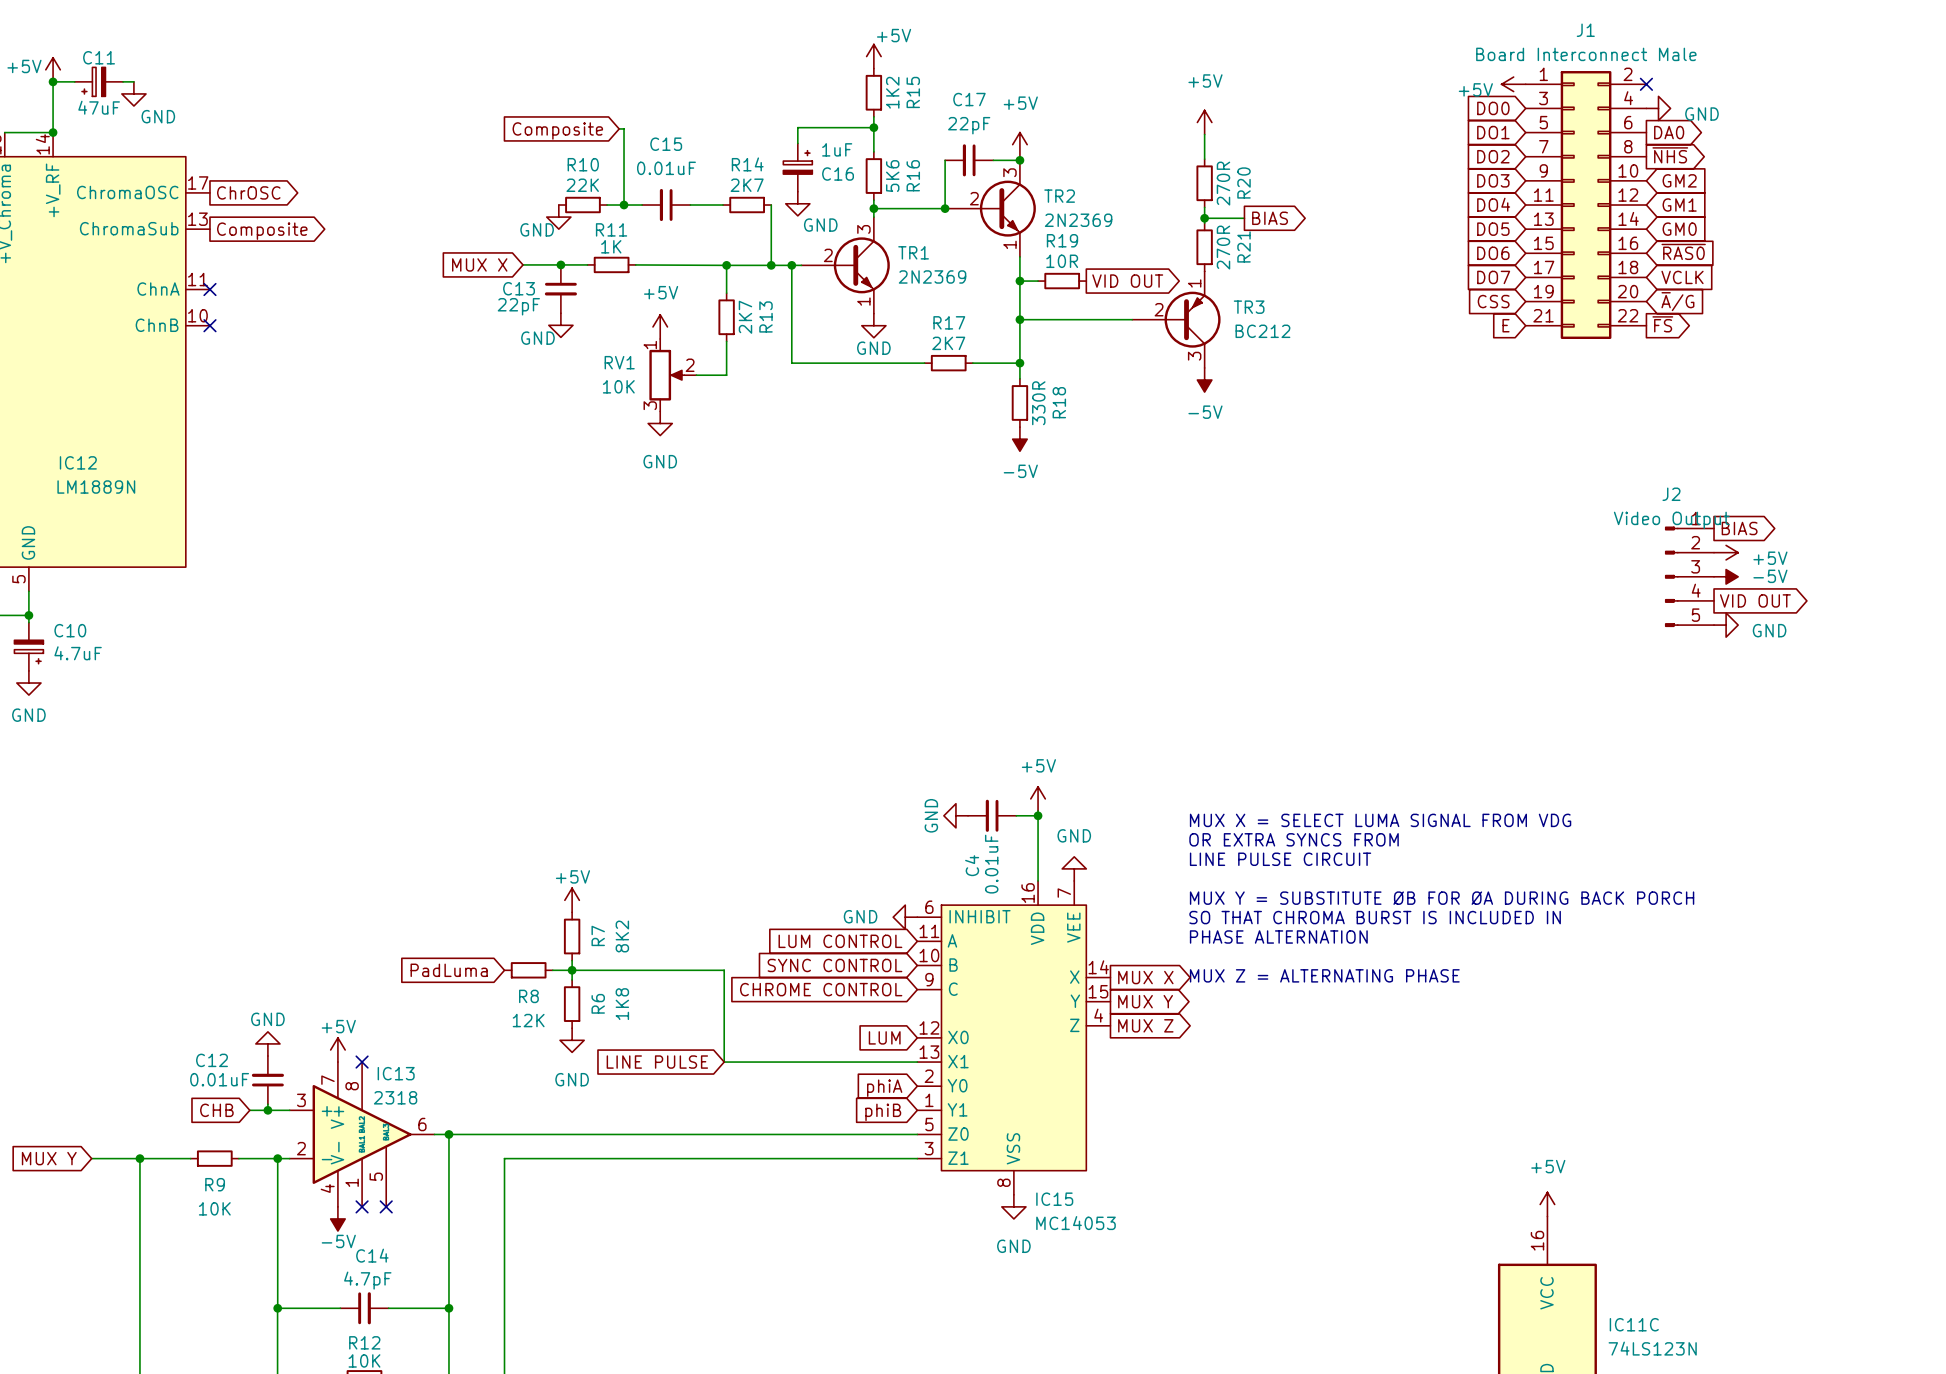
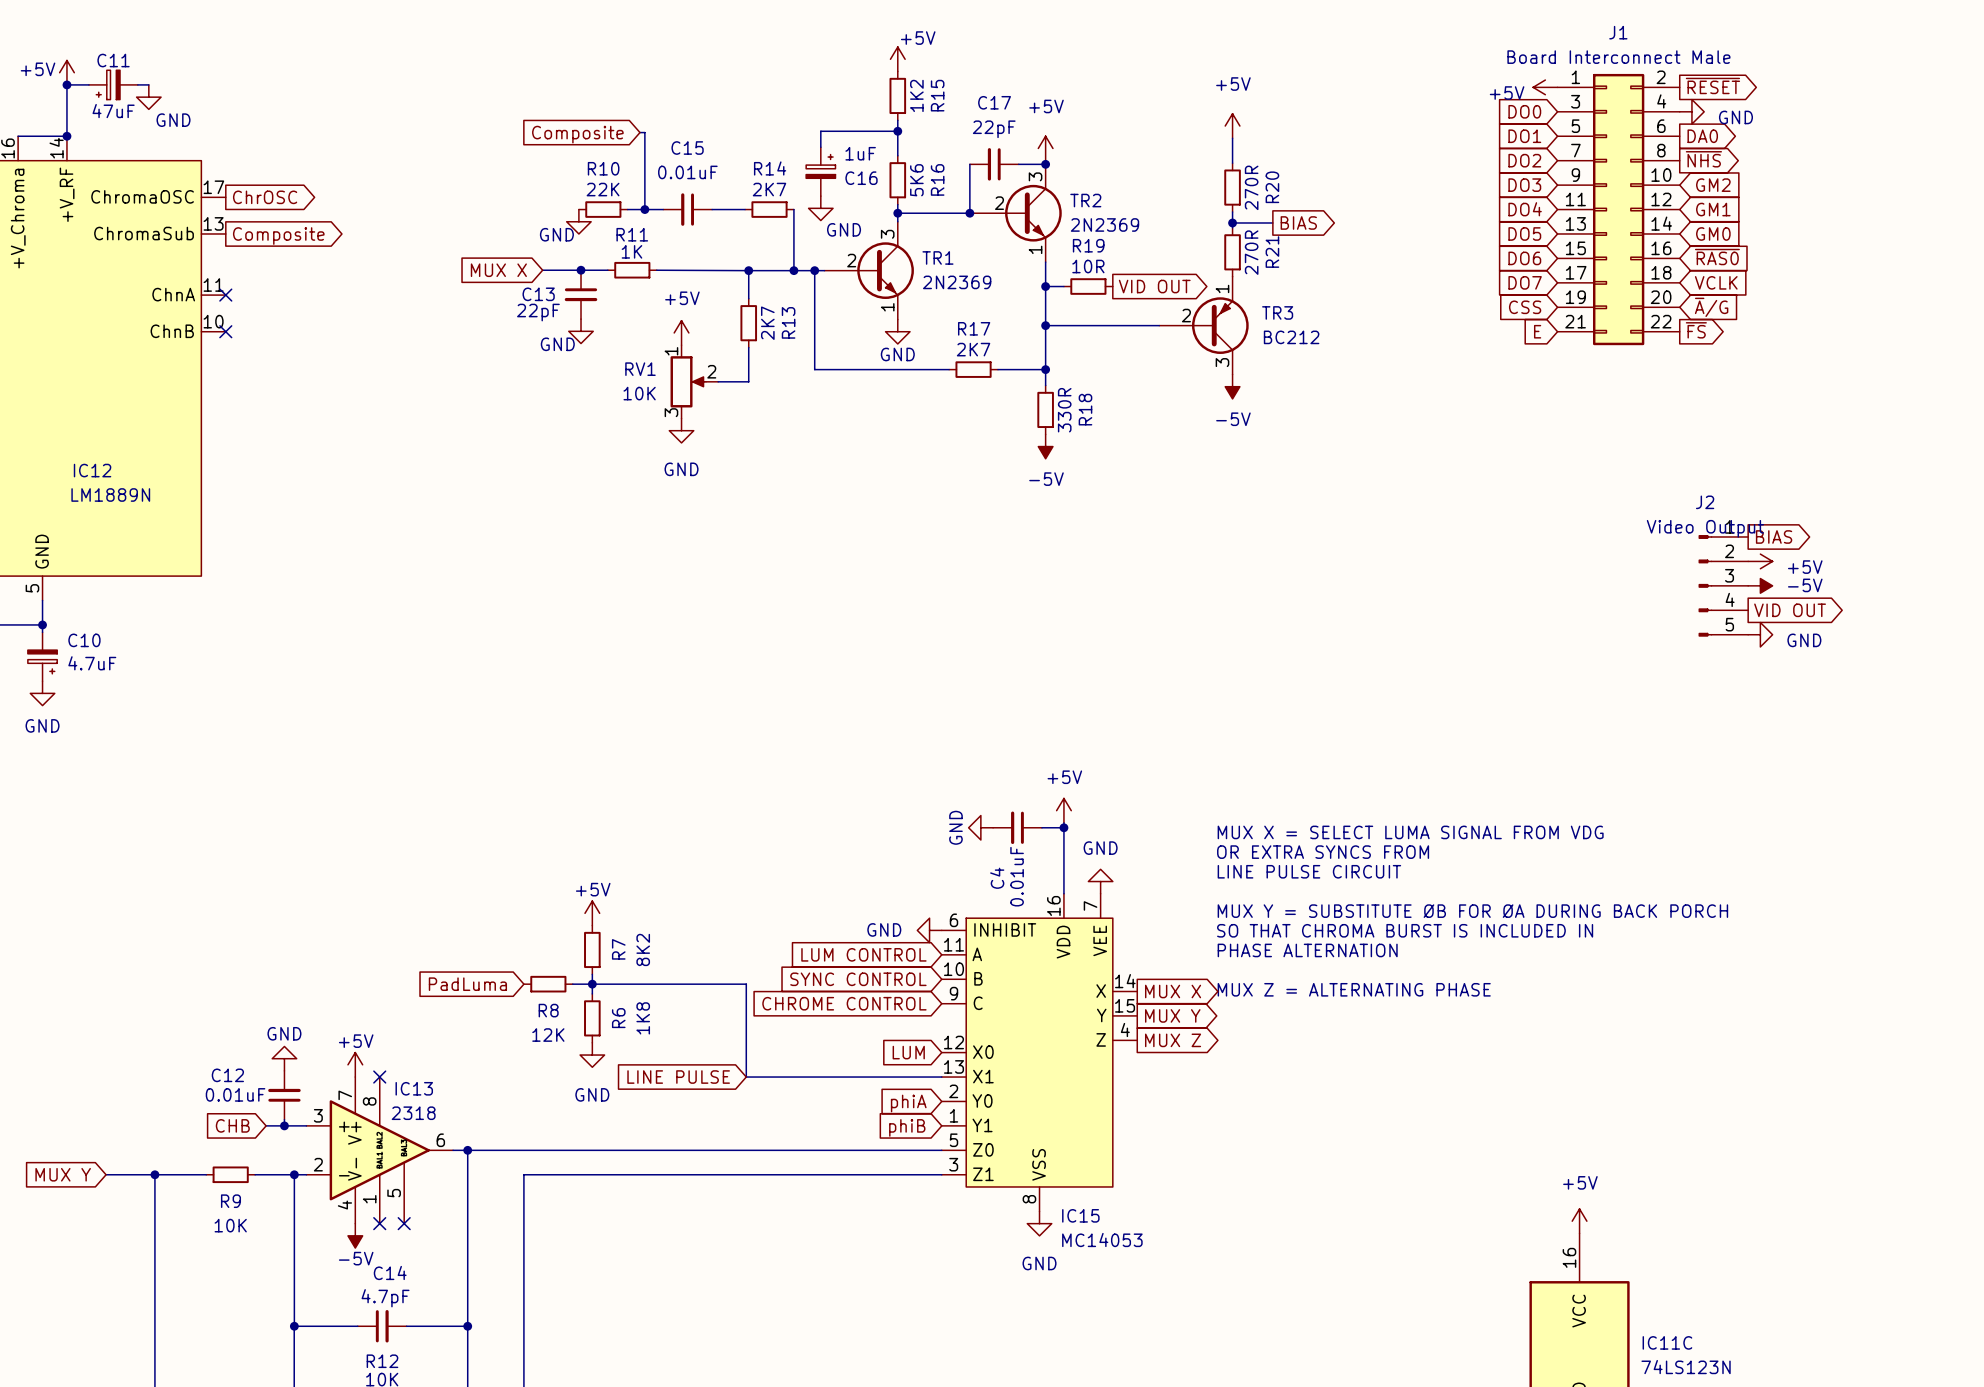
global label: none -> ~{RESET} (1712, 85)
no-connect mark: (1646, 84) -> none

